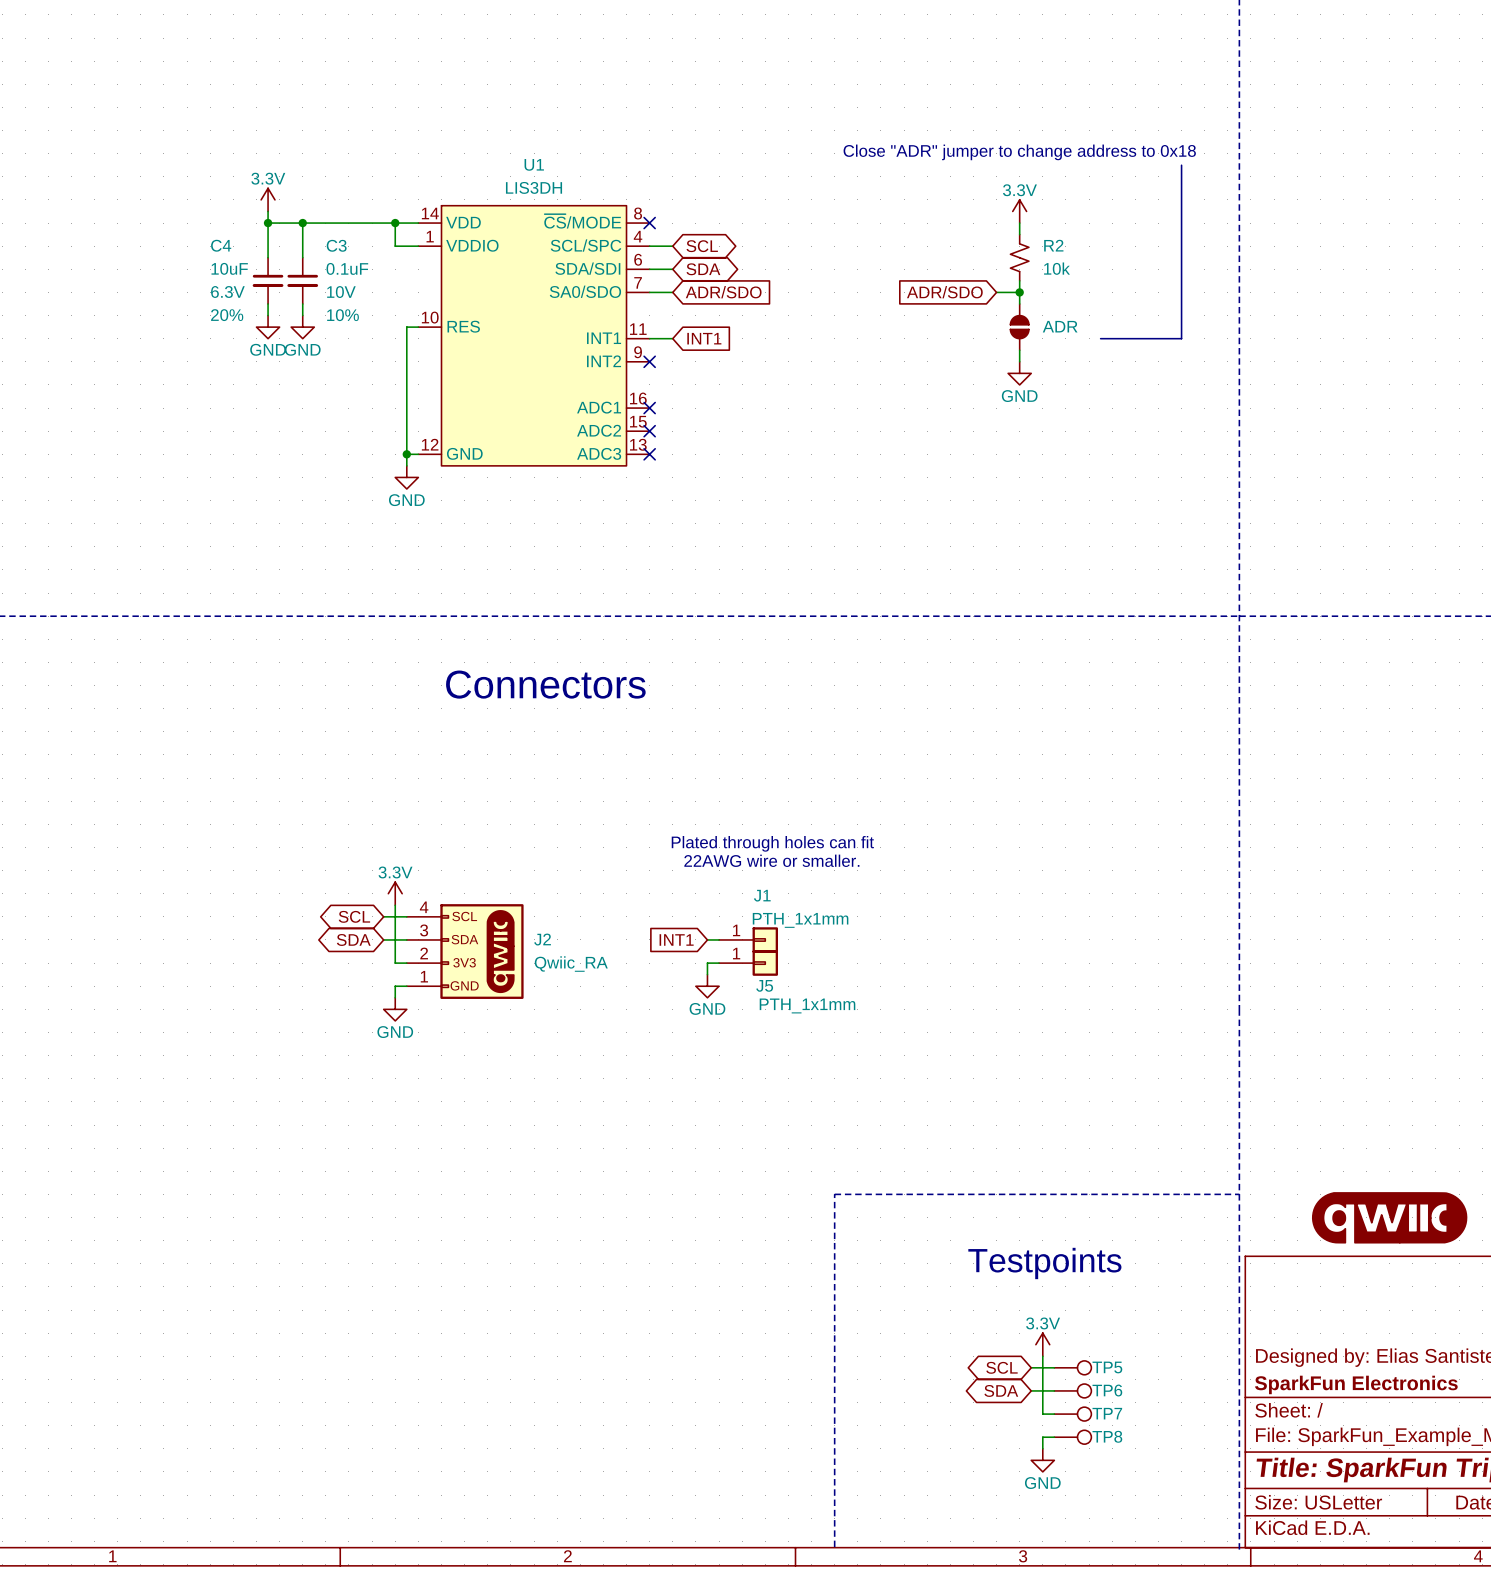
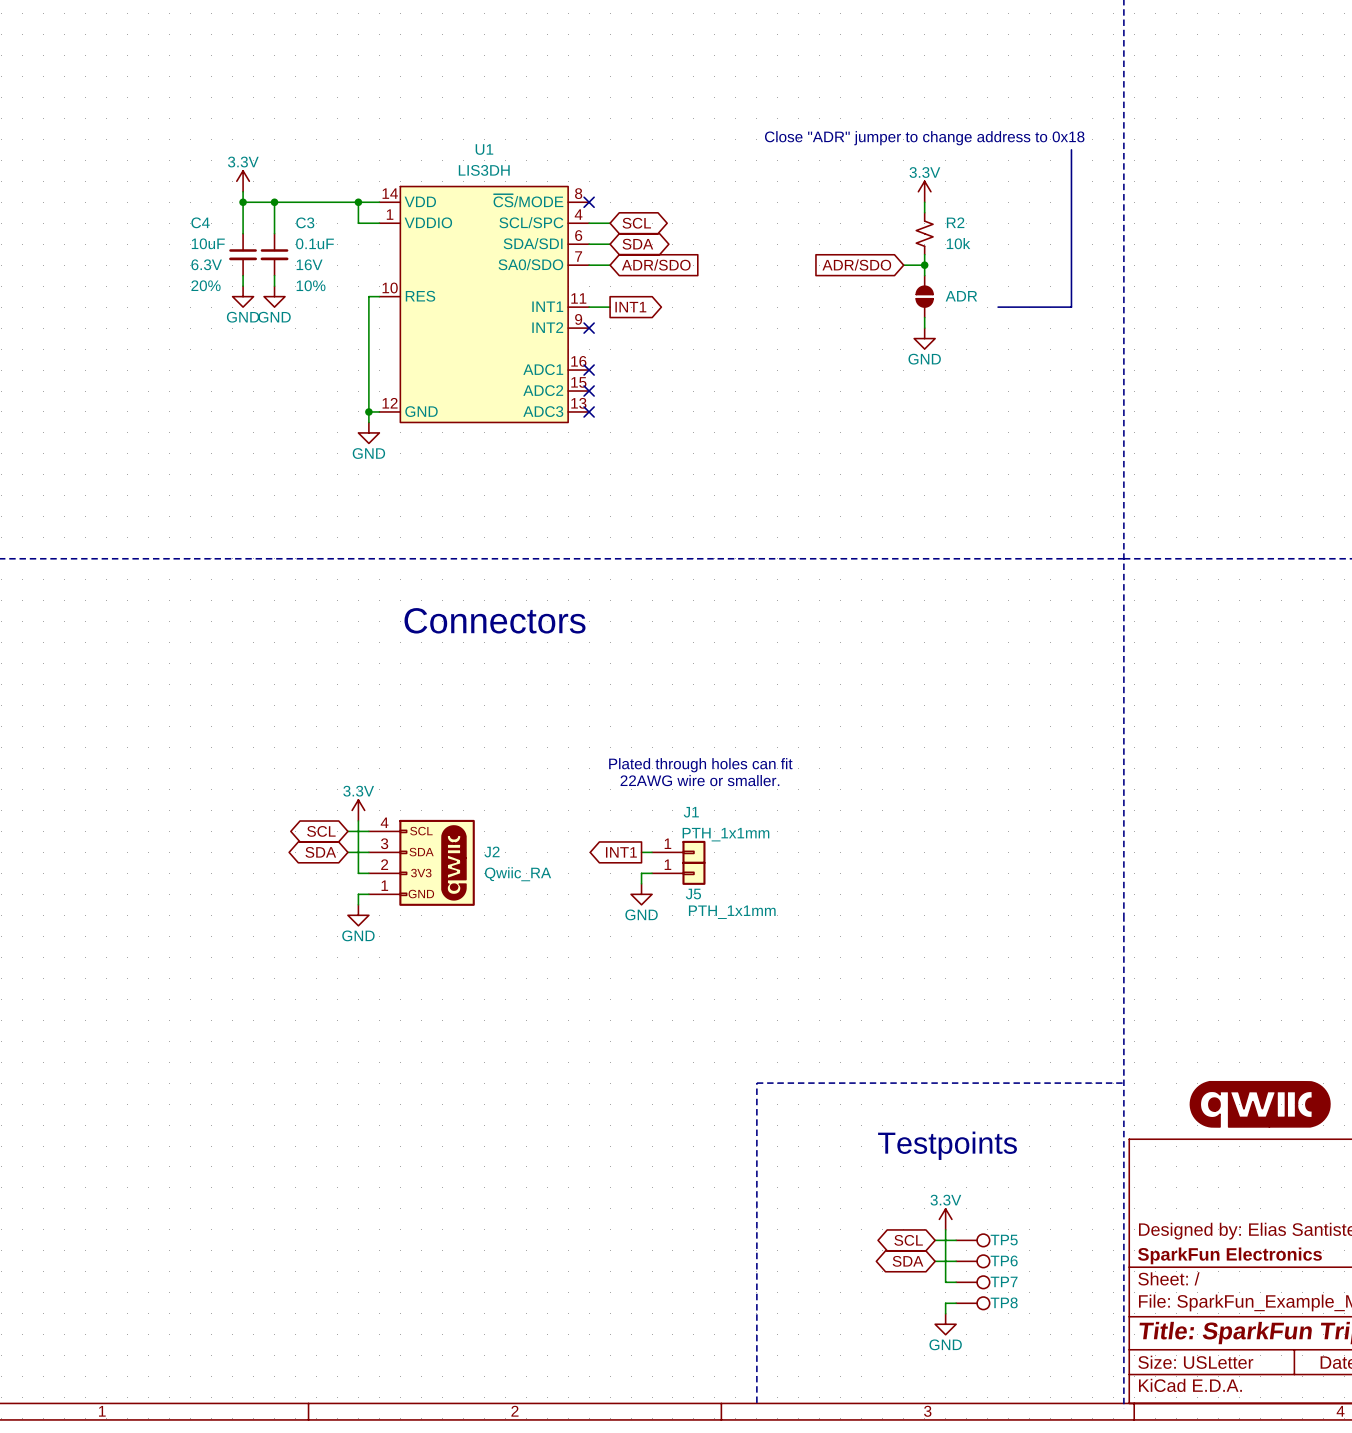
C3 text: 10V (341, 292) -> 16V (309, 264)
global label shape: input (704, 338) -> output (630, 307)
global label shape: input (676, 939) -> output (621, 852)

